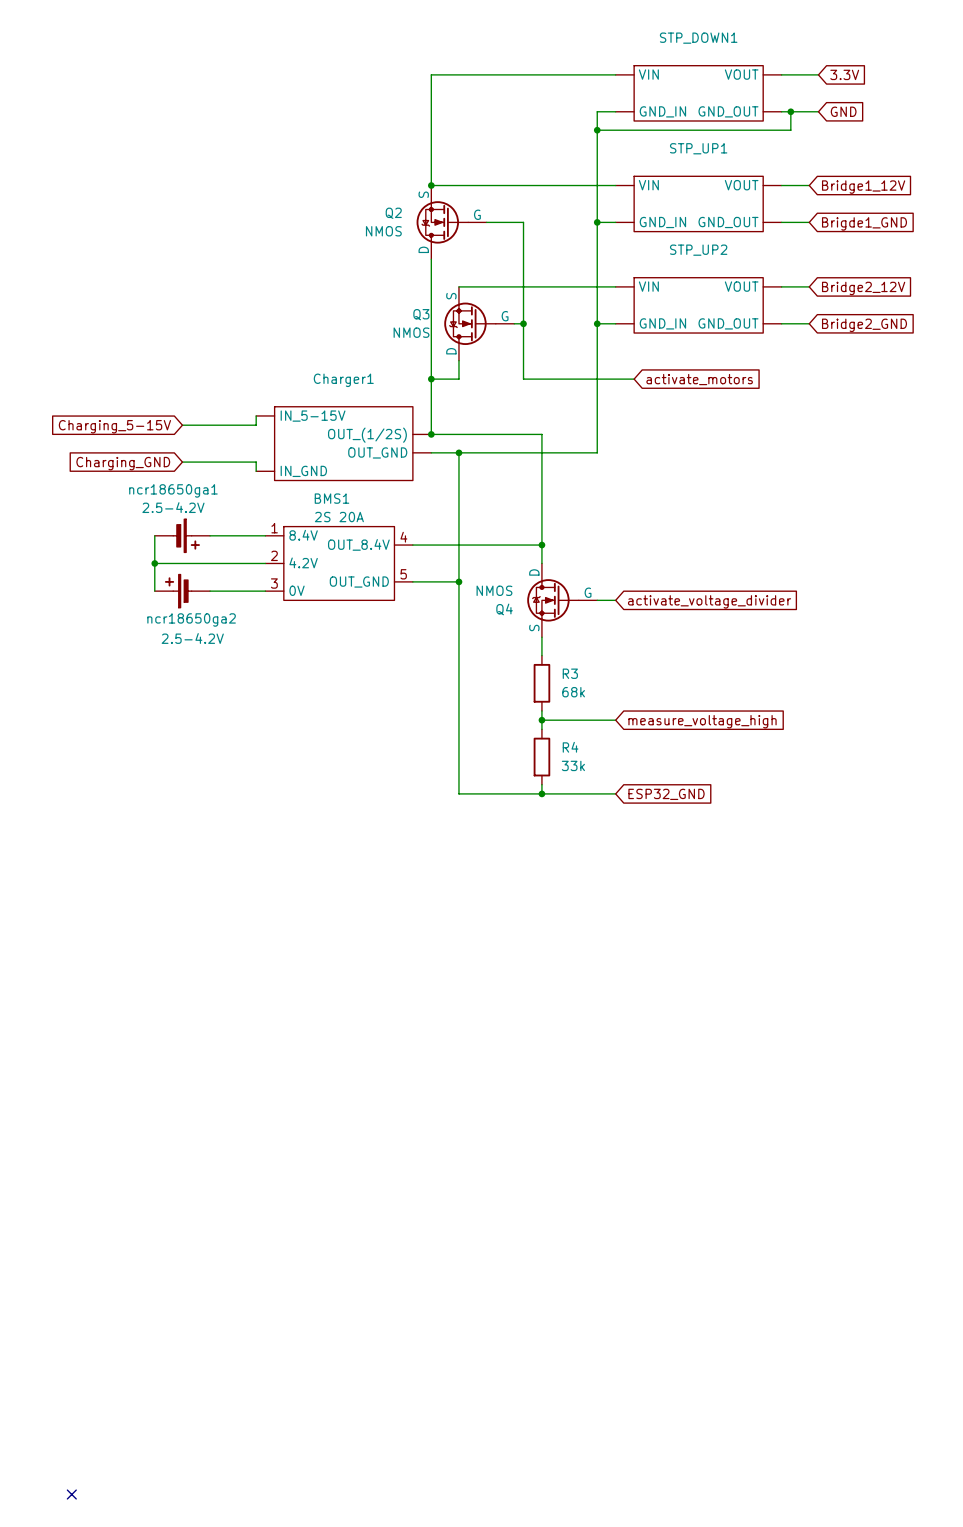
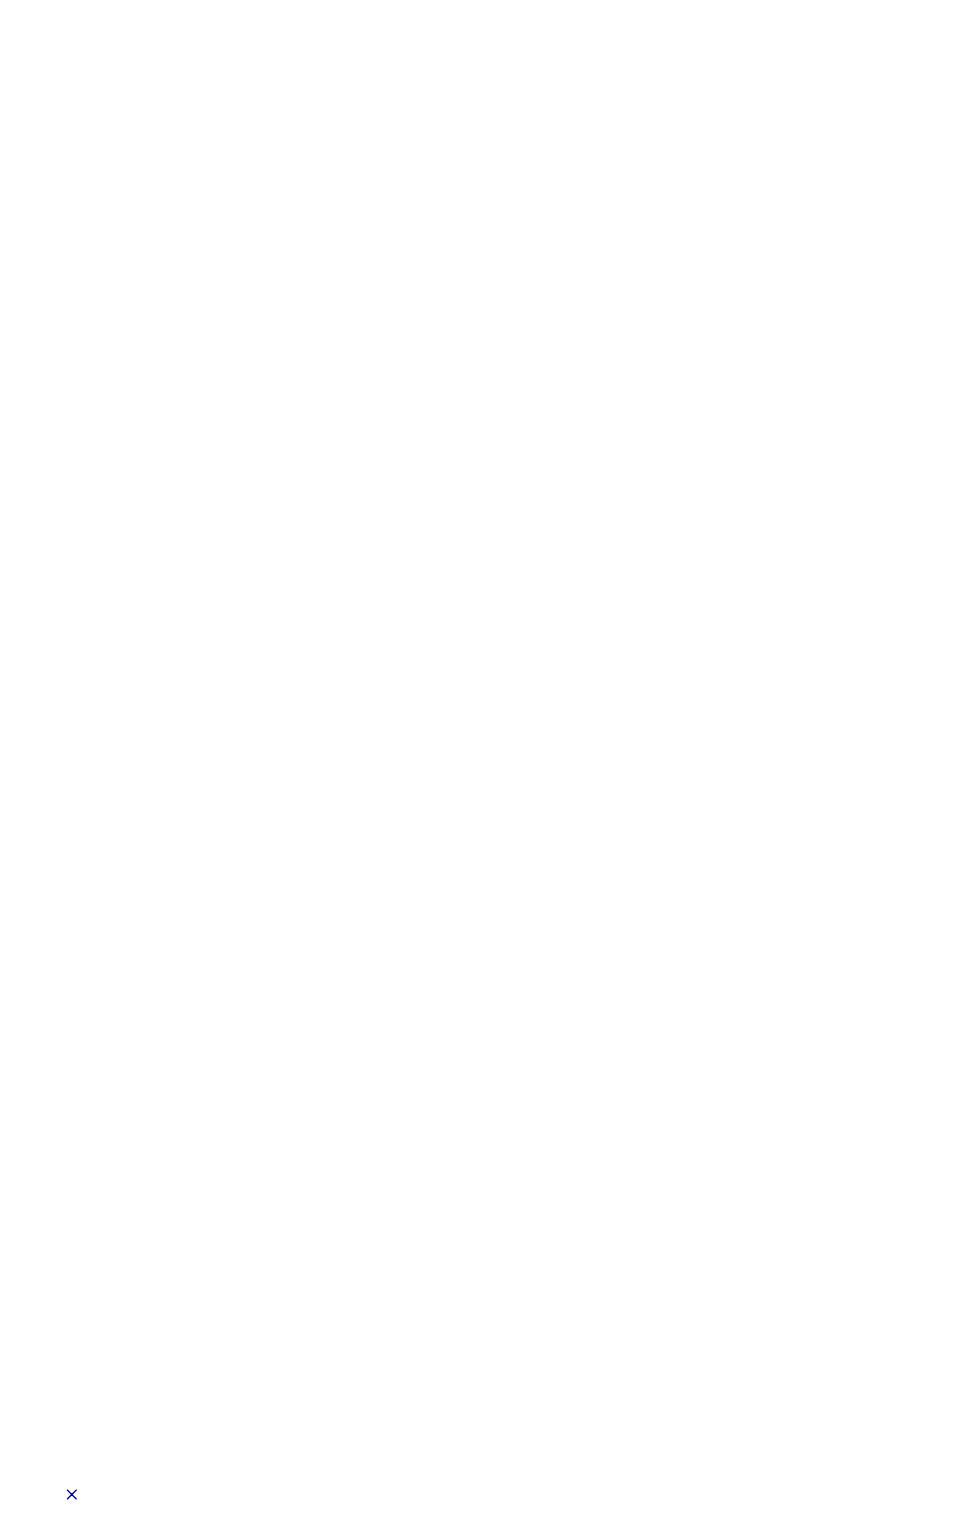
wire: (615, 74) (431, 74) (431, 185) (615, 185) -> none
wire: (781, 74) (818, 74) -> none
global label: 3.3V (844, 74) -> none
STP_DOWN1: (698, 93) -> none
wire: (615, 111) (597, 111) (597, 452) (431, 452) -> none
wire: (781, 111) (818, 111) -> none
wire: (790, 111) (790, 130) (597, 130) -> none
junction: (790, 111) -> none
global label: GND (843, 111) -> none
junction: (597, 130) -> none
junction: (431, 185) -> none
wire: (781, 185) (809, 185) -> none
global label: Bridge1_12V (863, 187) -> none
STP_UP1: (698, 203) -> none
Q2: NMOS (451, 222) -> none
wire: (486, 222) (523, 222) (523, 379) (634, 379) -> none
wire: (597, 222) (615, 222) -> none
junction: (597, 222) -> none
wire: (781, 222) (809, 222) -> none
global label: Brigde1_GND (864, 223) -> none
wire: (431, 259) (431, 434) (541, 434) (541, 563) -> none
wire: (458, 286) (615, 286) -> none
wire: (781, 286) (809, 286) -> none
global label: Bridge2_12V (863, 288) -> none
STP_UP2: (698, 305) -> none
Q3: NMOS (479, 323) -> none
wire: (514, 323) (523, 323) -> none
junction: (523, 323) -> none
wire: (597, 323) (615, 323) -> none
junction: (597, 323) -> none
wire: (781, 323) (809, 323) -> none
global label: Bridge2_GND (864, 325) -> none
wire: (458, 360) (458, 379) (431, 379) -> none
junction: (431, 379) -> none
global label: activate_motors (699, 379) -> none
wire: (256, 415) (256, 425) (182, 425) -> none
global label: Charging_5-15V (114, 426) -> none
junction: (431, 434) -> none
Charger1: (343, 443) -> none
wire: (458, 452) (458, 793) (615, 793) -> none
junction: (458, 452) -> none
wire: (182, 462) (256, 462) (256, 471) -> none
global label: Charging_GND (123, 463) -> none
wire: (154, 535) (154, 591) -> none
ncr18650ga1: 2.5-4.2V (182, 535) -> none
wire: (210, 535) (265, 535) -> none
wire: (412, 545) (541, 545) -> none
junction: (541, 545) -> none
wire: (154, 563) (265, 563) -> none
junction: (154, 563) -> none
BMS1: 2S 20A (339, 563) -> none
wire: (412, 581) (458, 581) -> none
junction: (458, 581) -> none
ncr18650ga2: 2.5-4.2V (182, 591) -> none
wire: (210, 591) (265, 591) -> none
Q4: NMOS (562, 600) -> none
wire: (597, 600) (615, 600) -> none
global label: activate_voltage_divider (709, 601) -> none
wire: (541, 637) (541, 655) -> none
R3: 68k (541, 683) -> none
wire: (541, 710) (541, 729) -> none
wire: (541, 720) (615, 720) -> none
junction: (541, 720) -> none
global label: measure_voltage_high (702, 721) -> none
R4: 33k (541, 757) -> none
wire: (541, 784) (541, 793) -> none
junction: (541, 793) -> none
global label: ESP32_GND (666, 794) -> none

